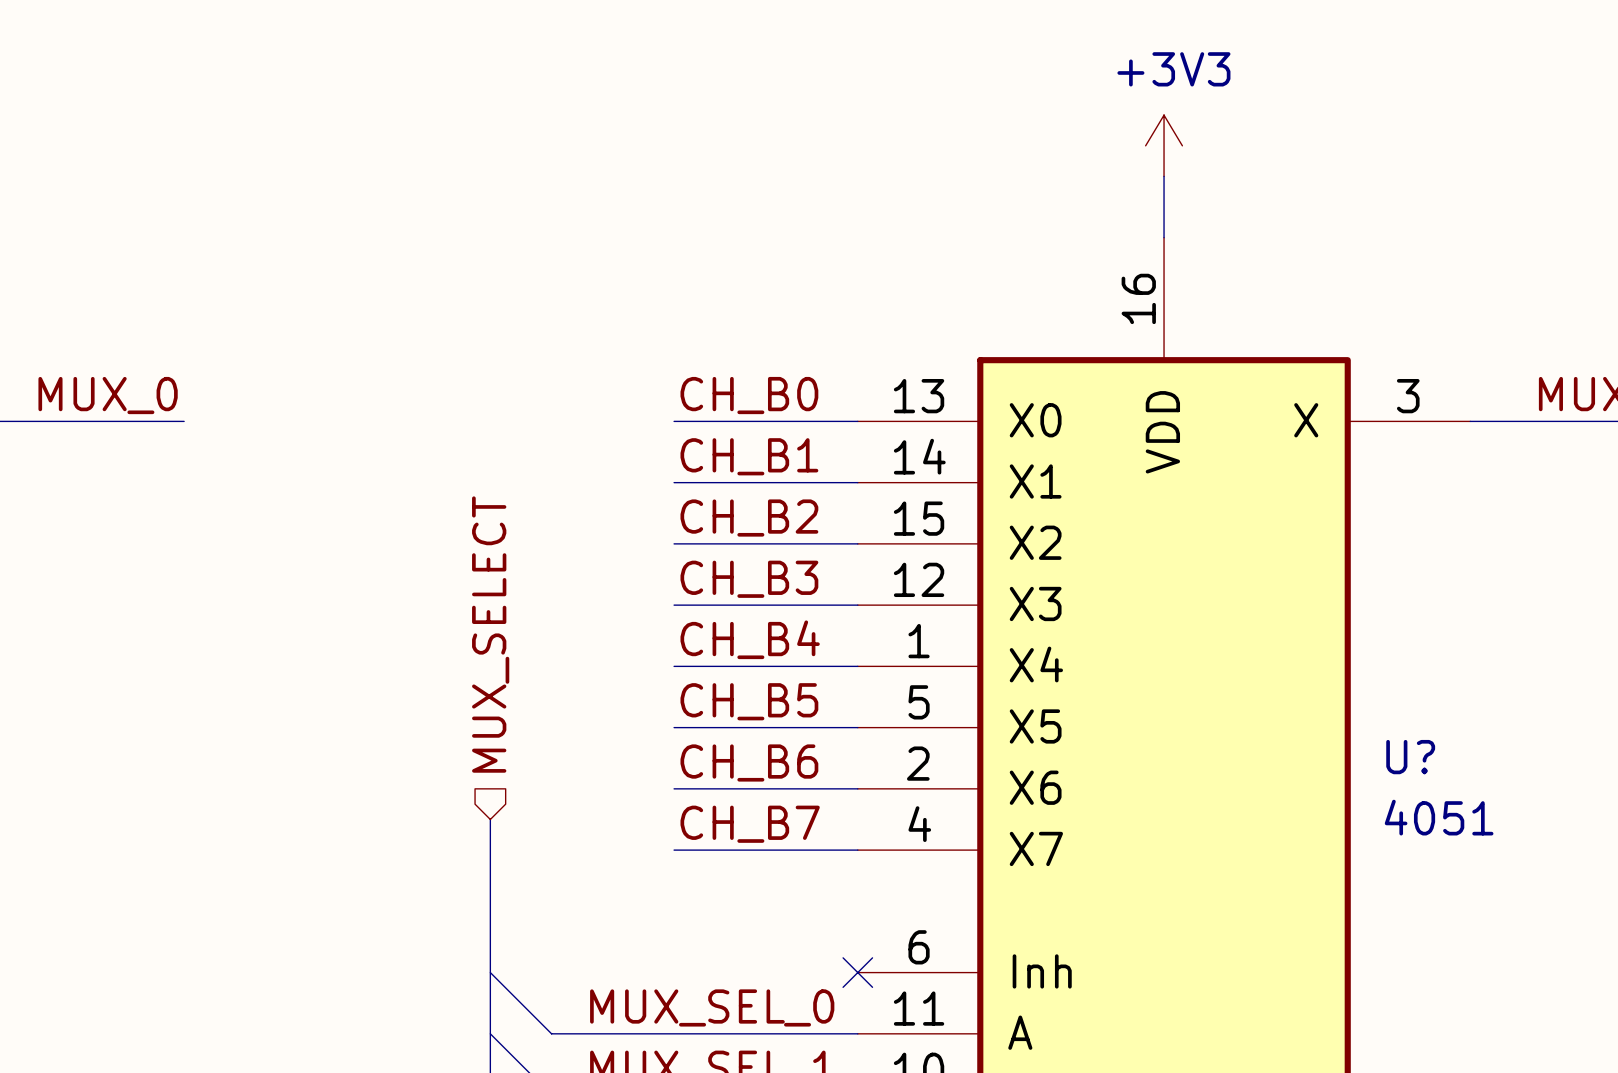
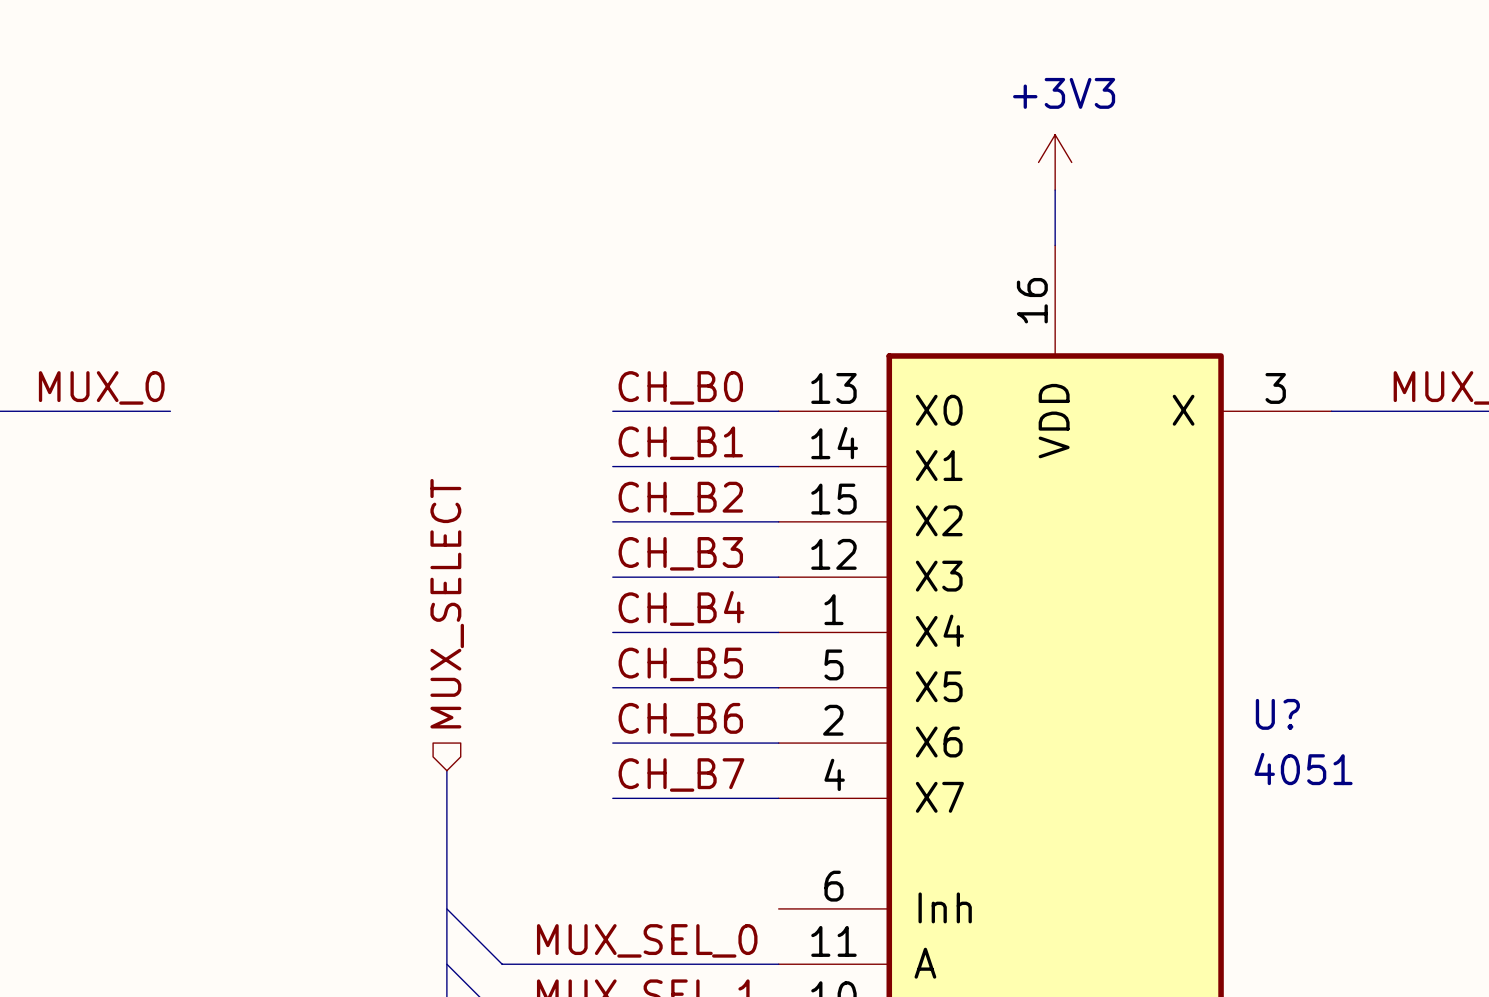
no-connect mark: (857, 972) -> none

